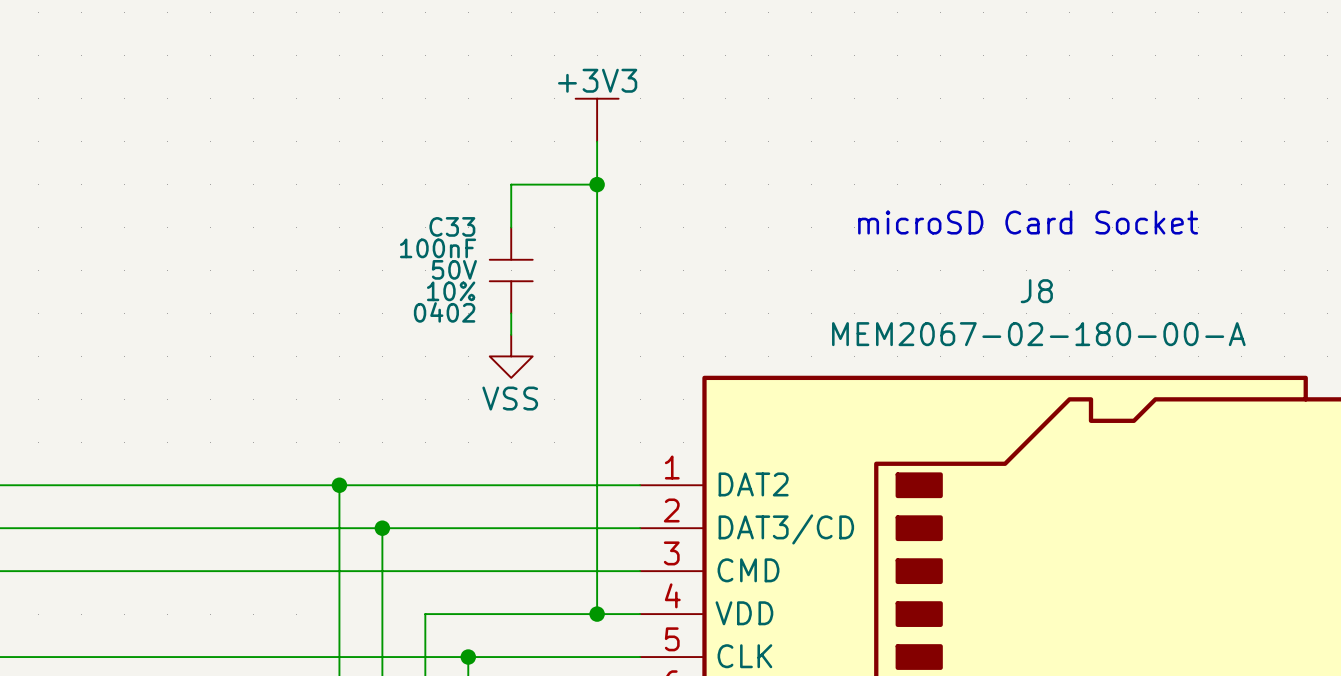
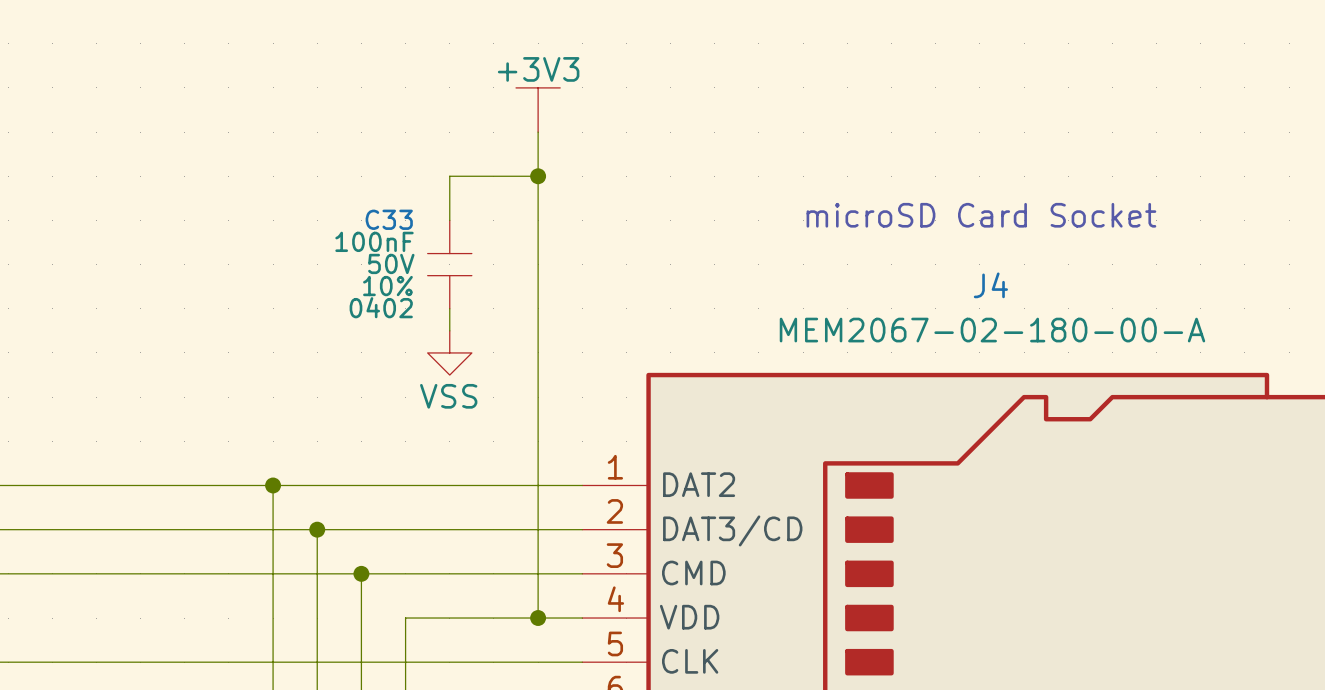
J8 name: J8 (1036, 291) -> J4 (990, 285)
wire: (425, 614) (468, 614) -> (361, 618) (361, 573)
wire: none -> (405, 618) (405, 662)
junction position: (468, 657) -> (361, 573)

